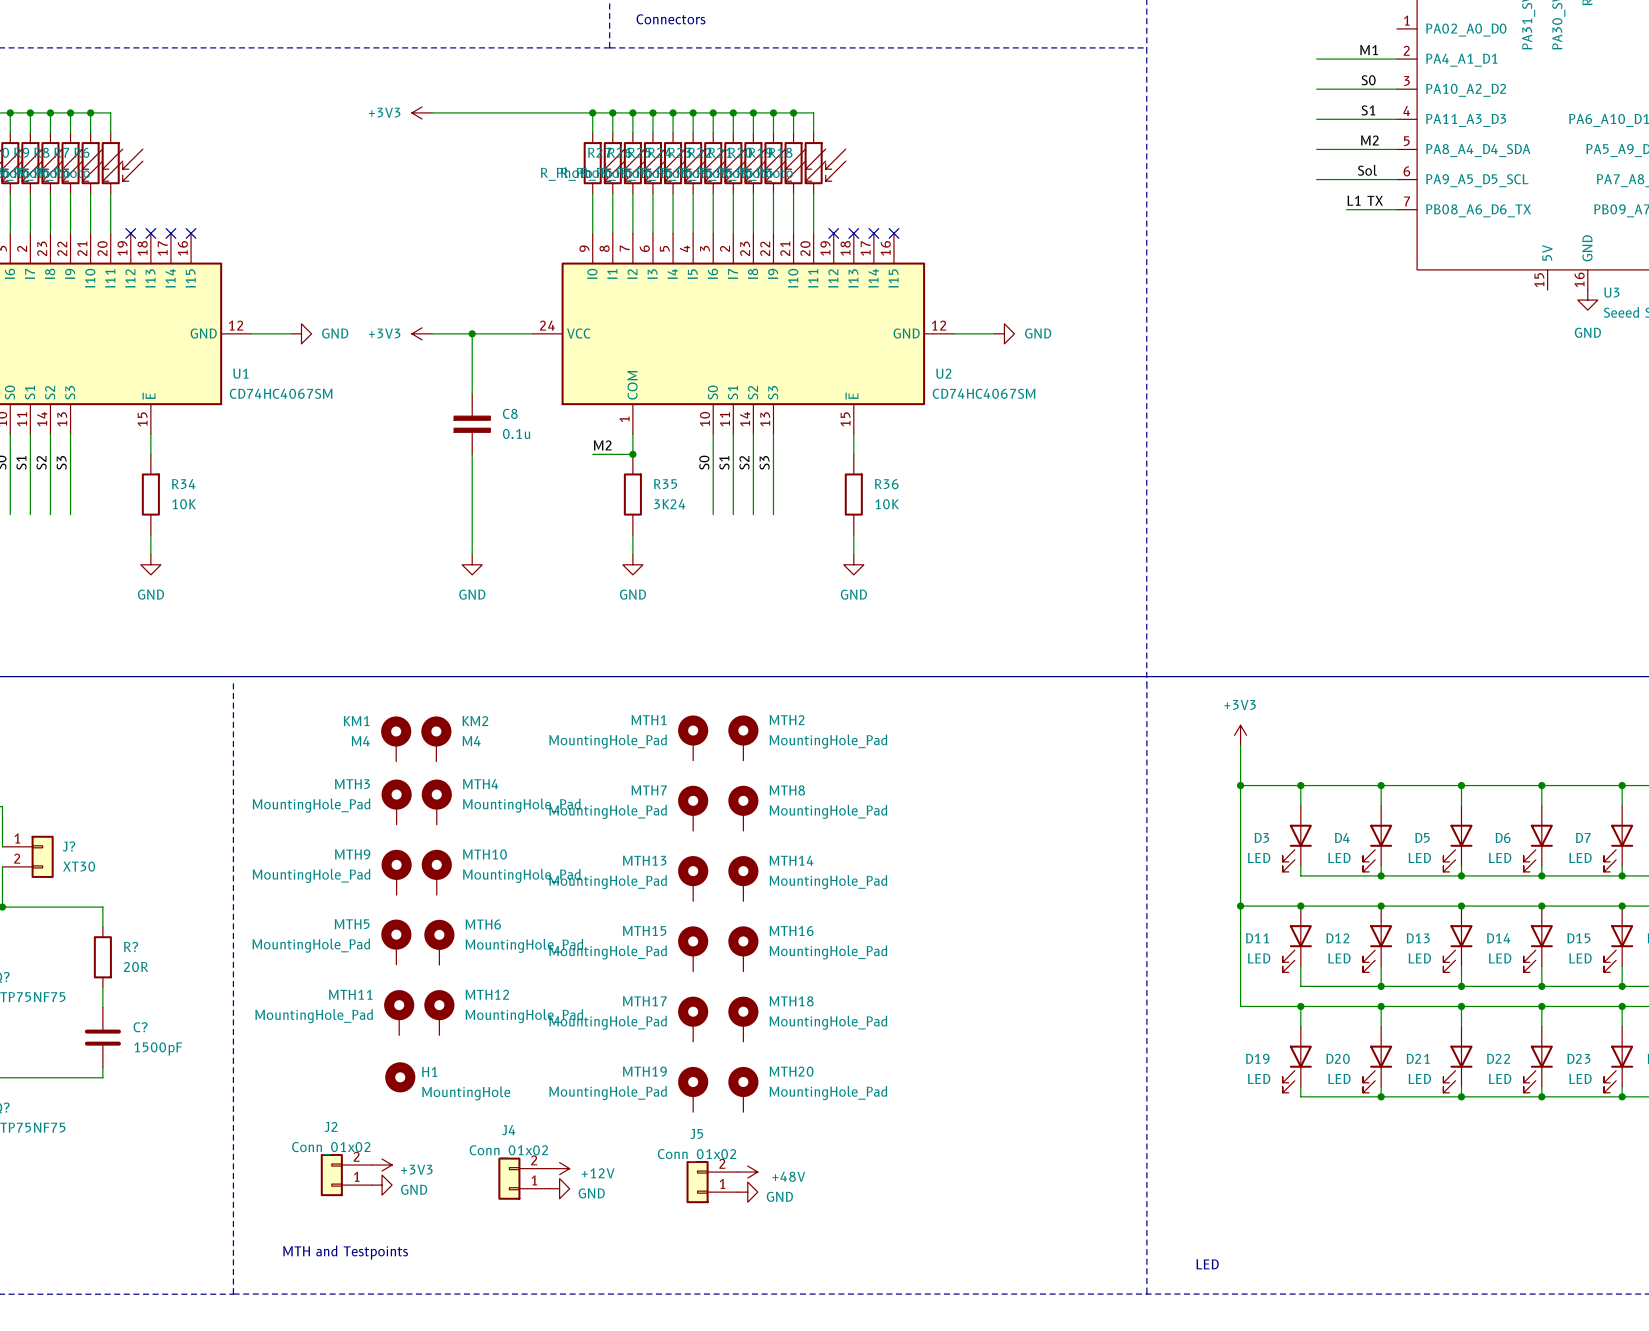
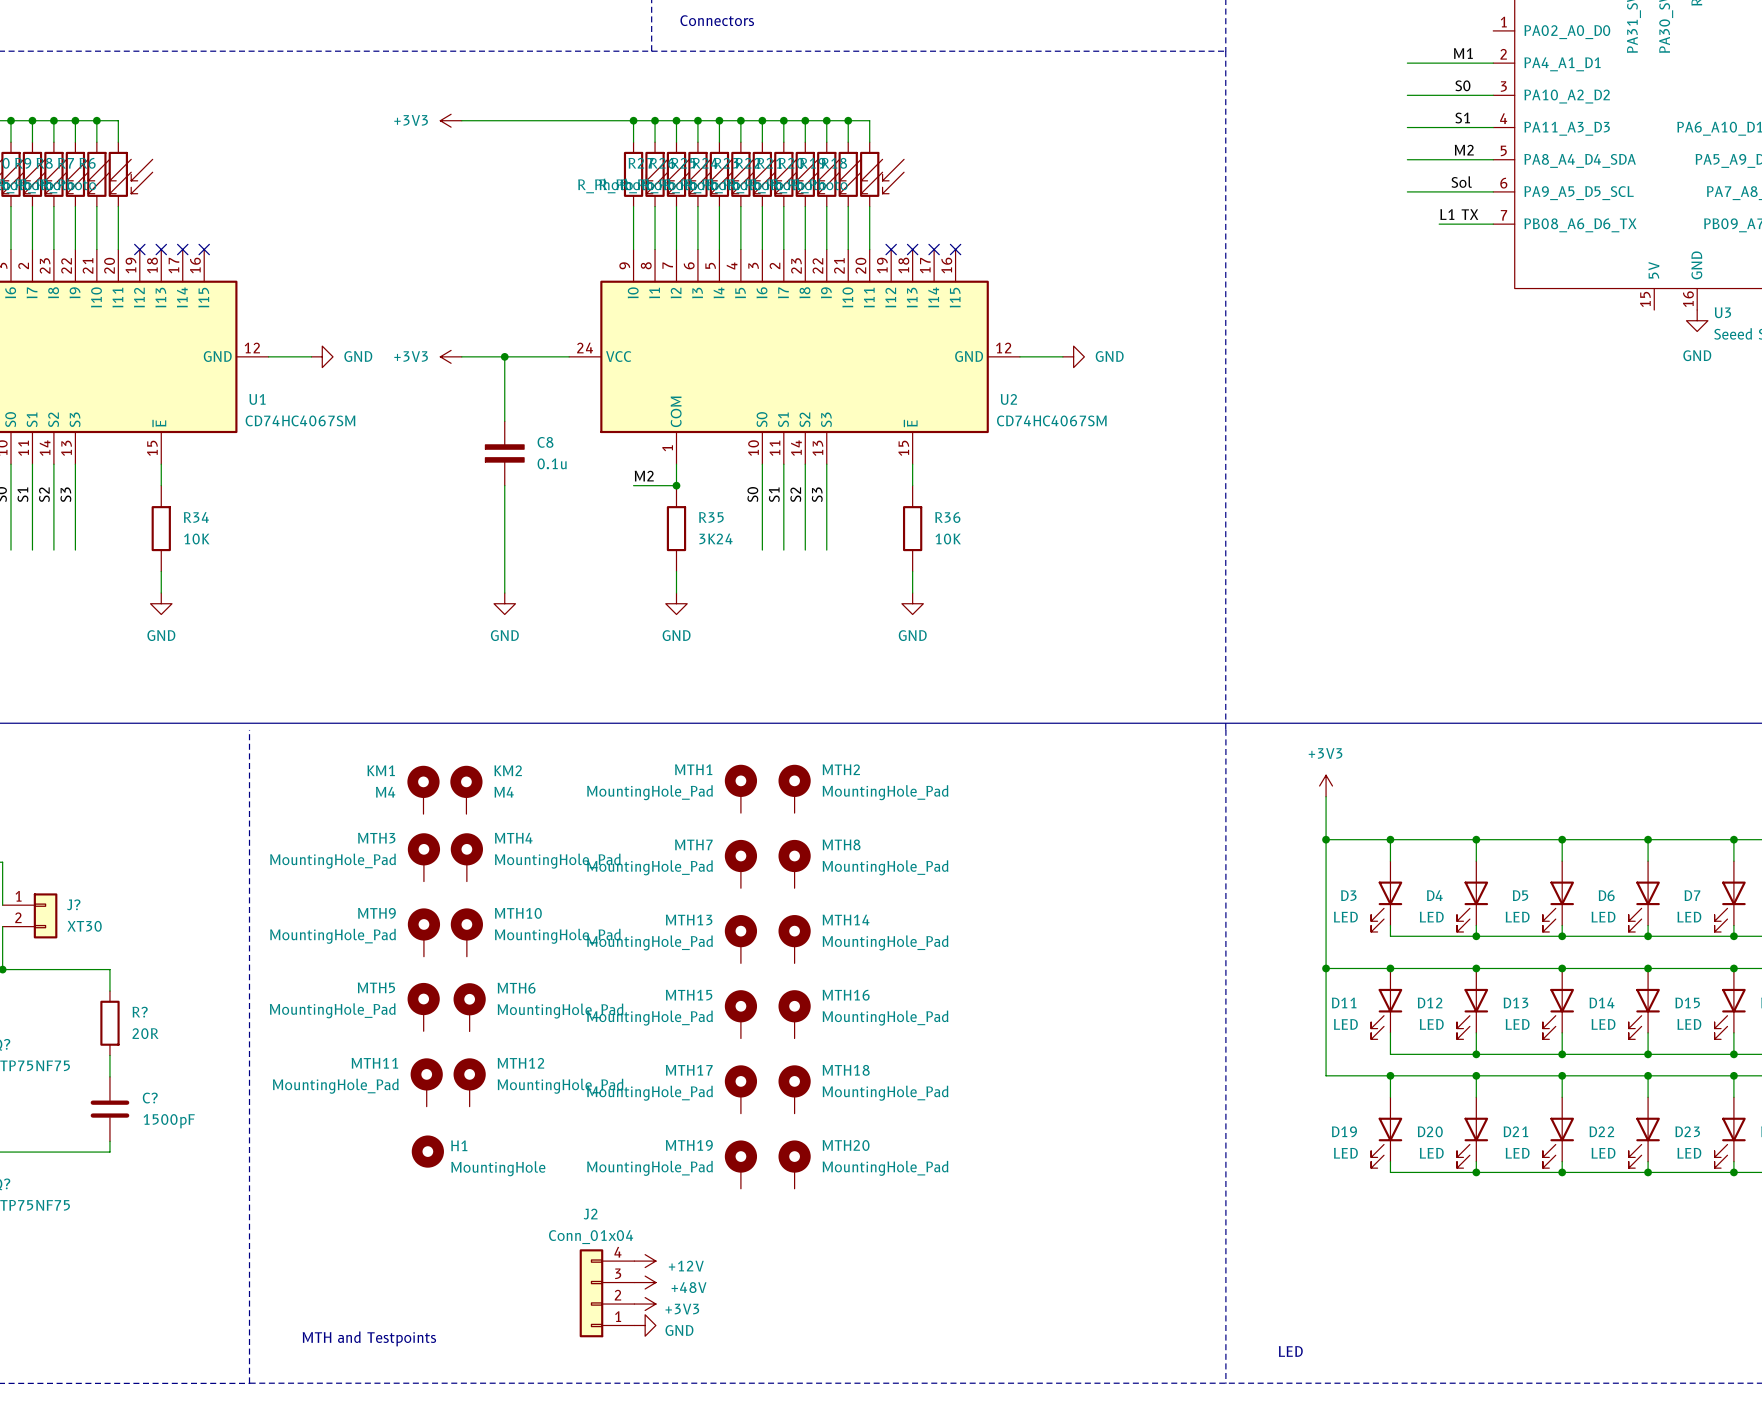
J2 name position: J2 (331, 1126) -> J2 (590, 1214)
J2 value: Conn_01x02 (331, 1148) -> Conn_01x04 (591, 1237)
J2 symbol: [320, 1153, 372, 1197] -> [579, 1249, 635, 1338]
power symbol: +3V3 (382, 1165) -> none
power symbol position: +12V (559, 1168) -> +12V (645, 1261)
power symbol position: +48V (747, 1172) -> +48V (645, 1282)
J4: Conn_01x02 (523, 1178) -> none
J5: Conn_01x02 (712, 1182) -> none
power symbol: GND (382, 1185) -> none
power symbol position: GND (559, 1188) -> GND (645, 1325)
power symbol: GND (747, 1192) -> none
power symbol: none -> +3V3 (645, 1304)

